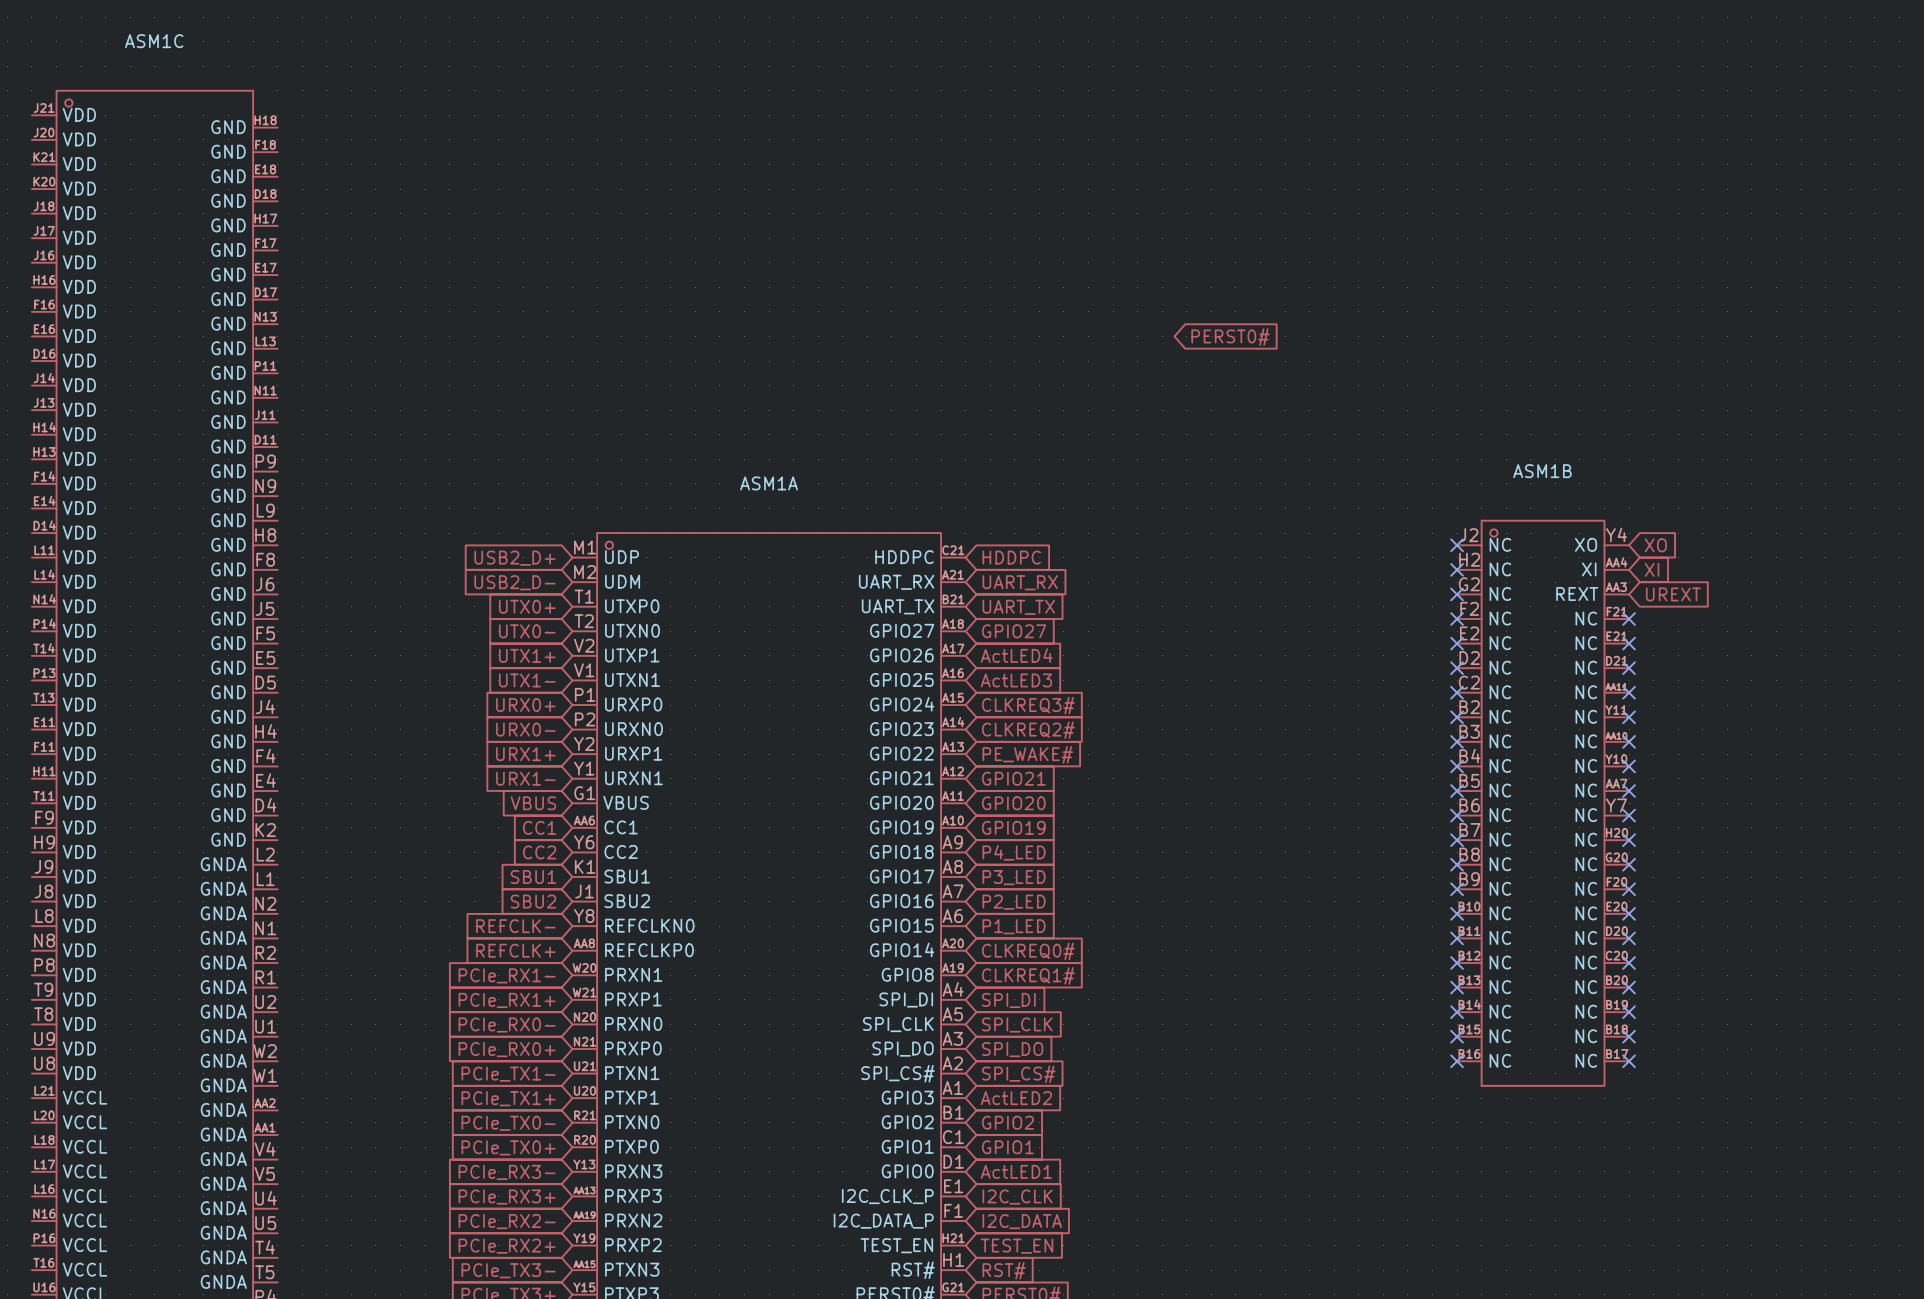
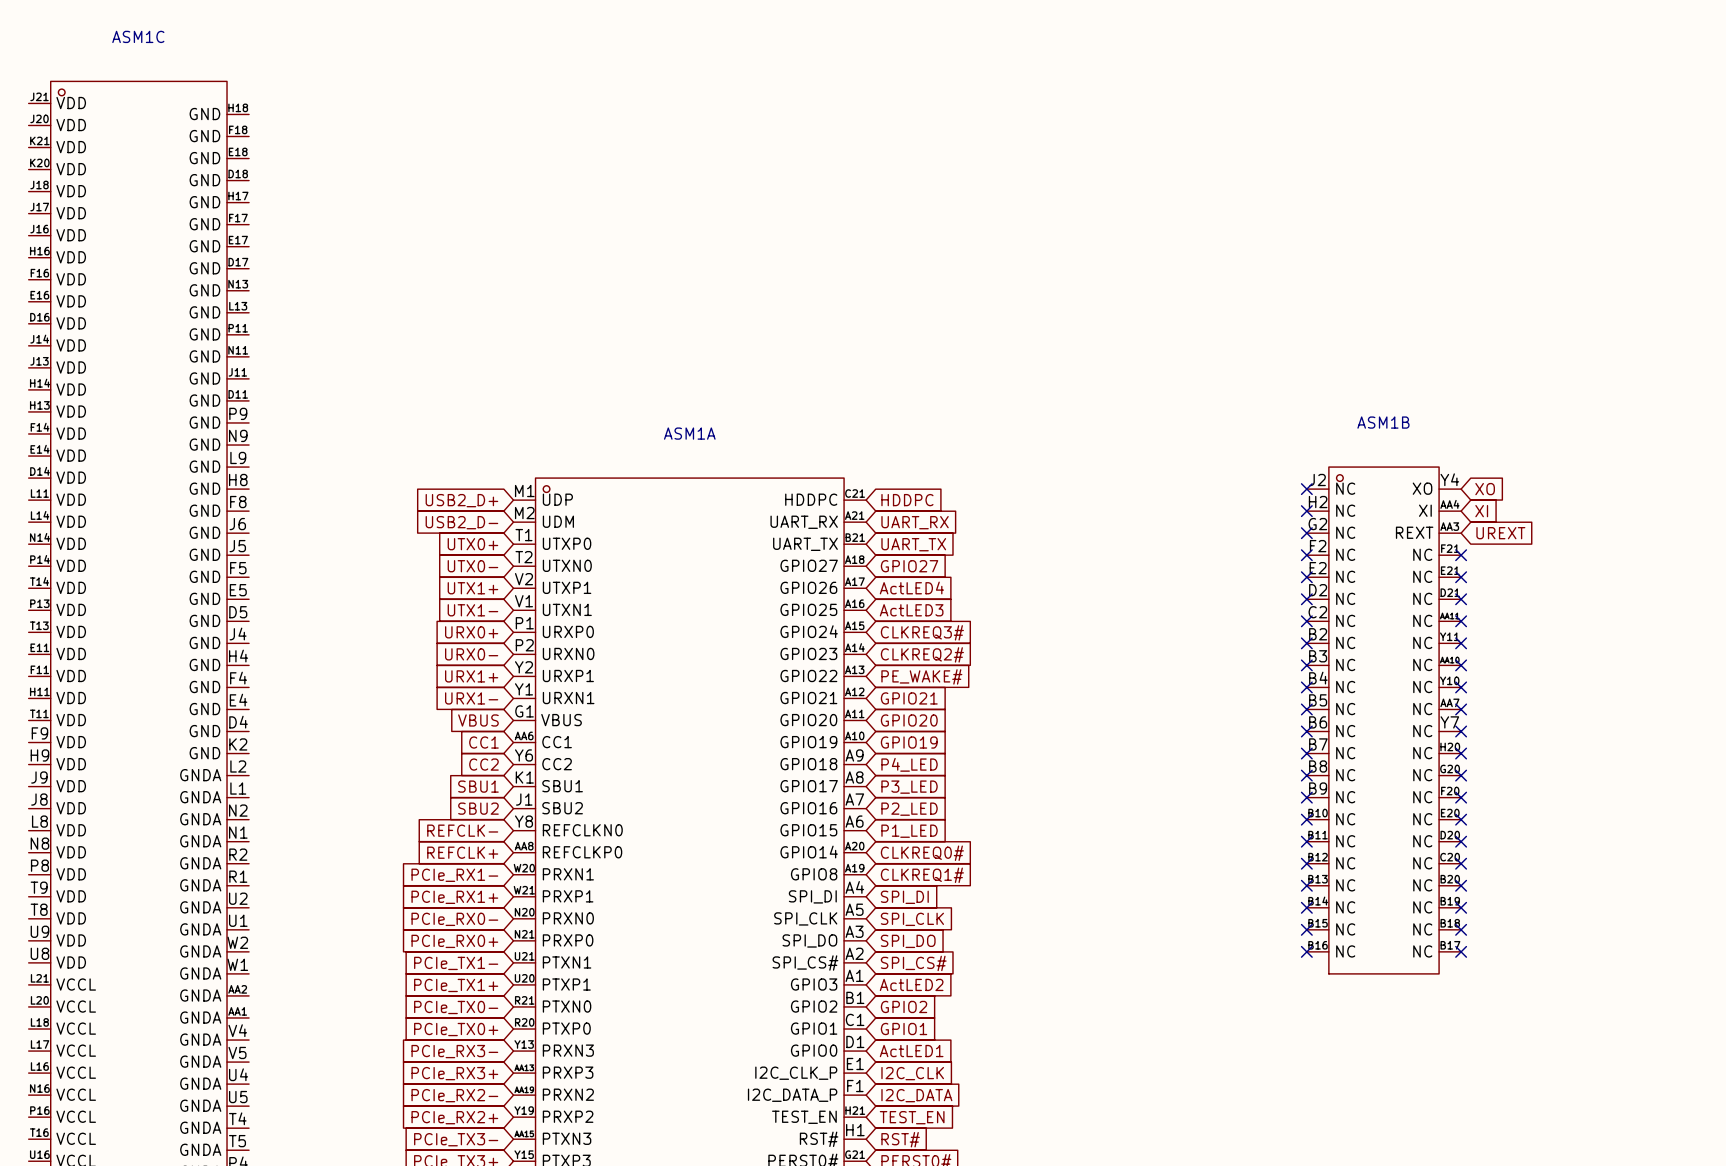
global label: PERST0# (1230, 337) -> none

